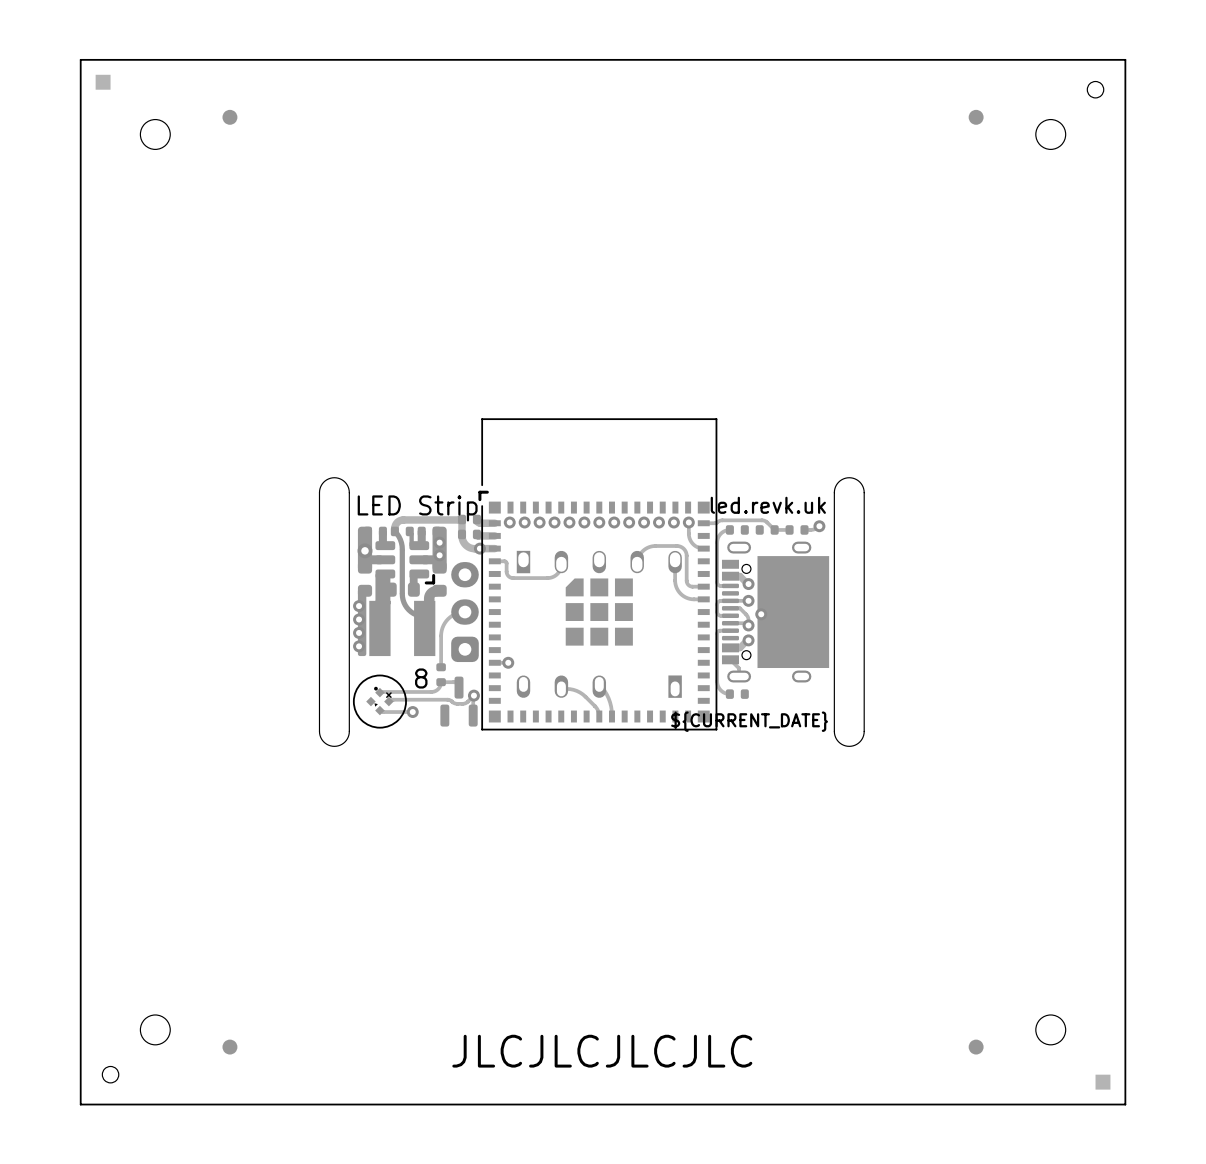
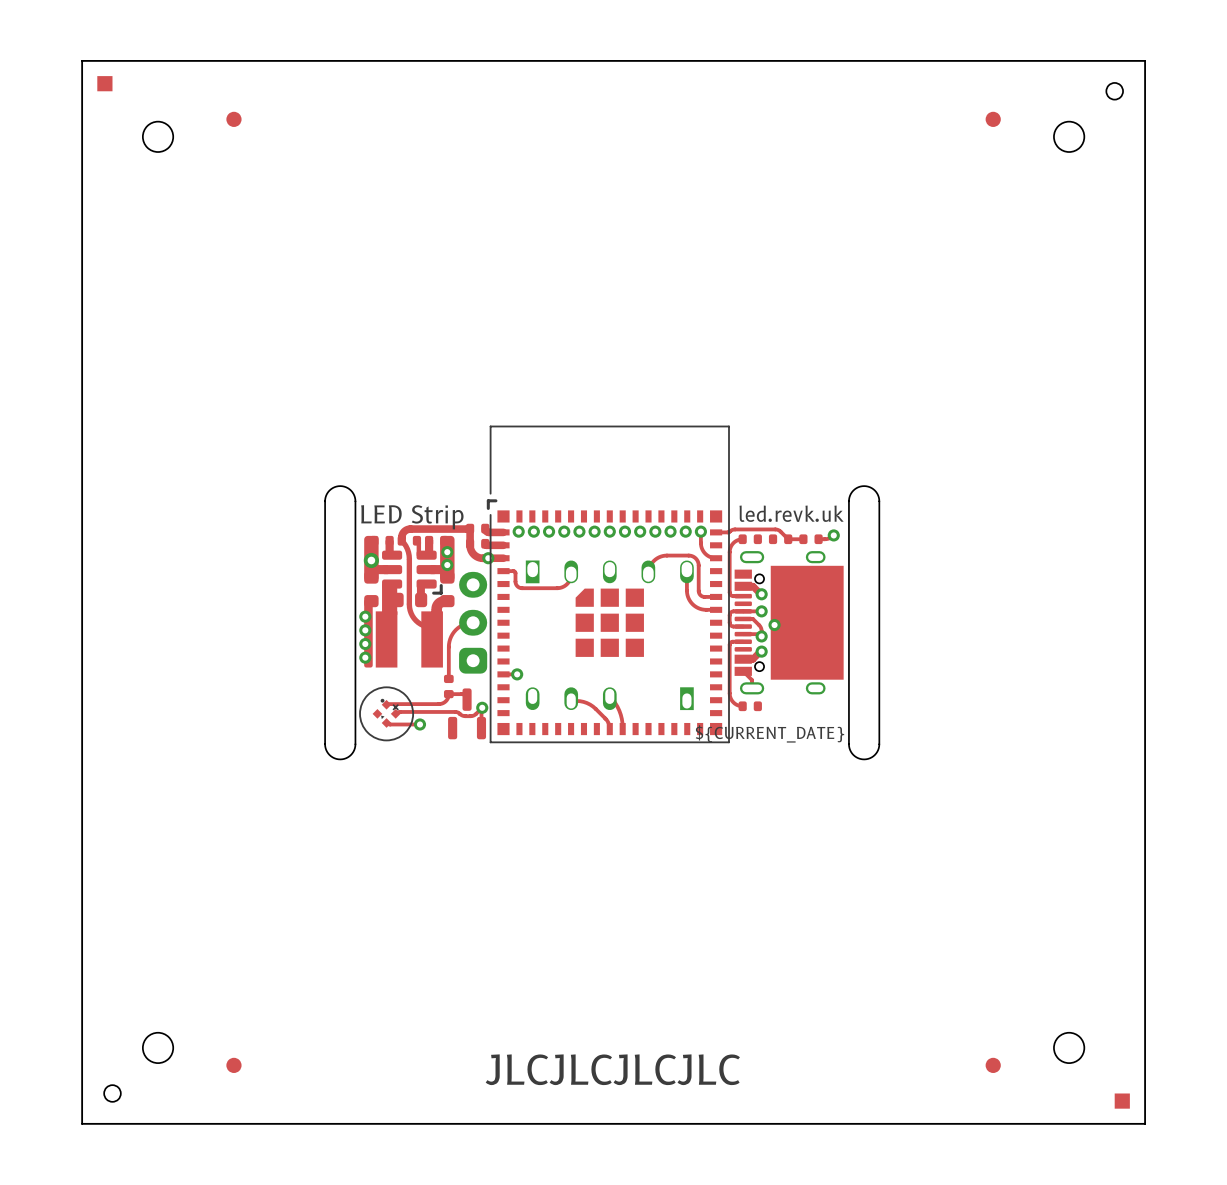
text: 8 (421, 678) -> none

